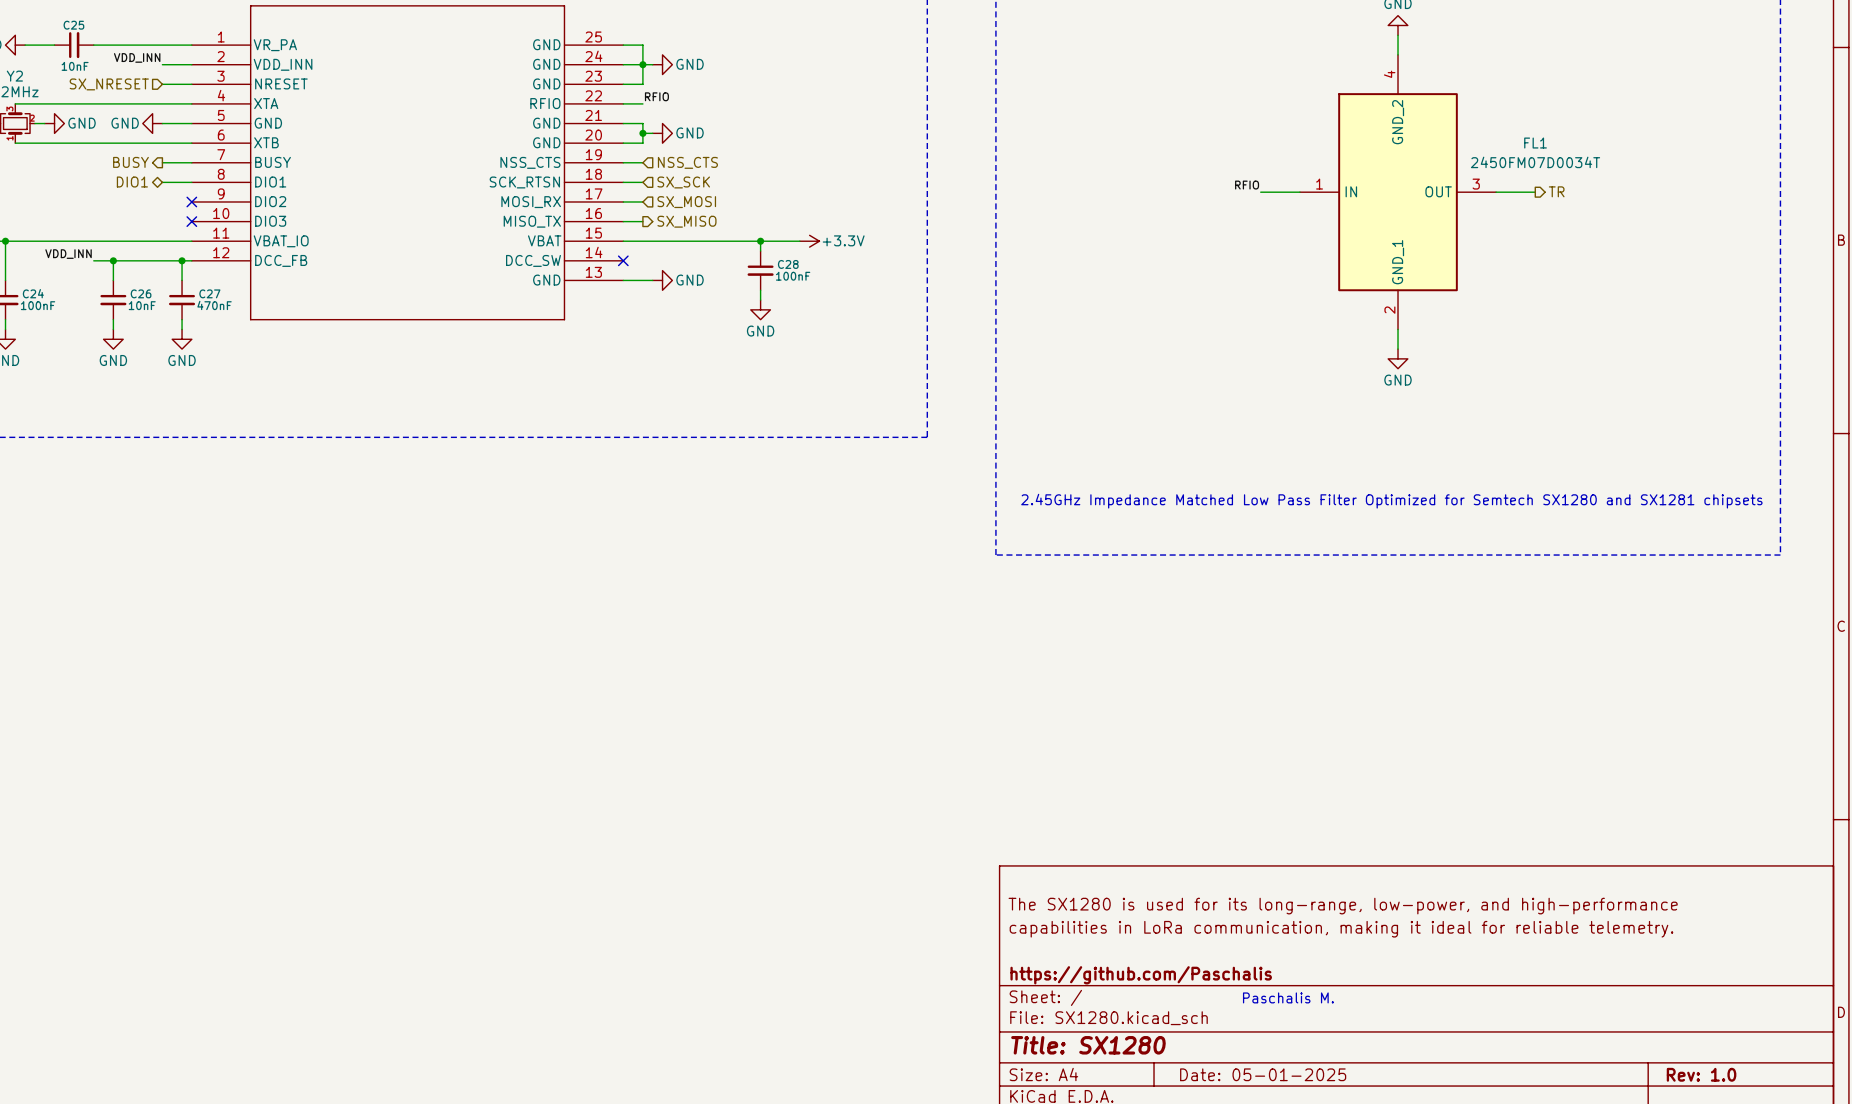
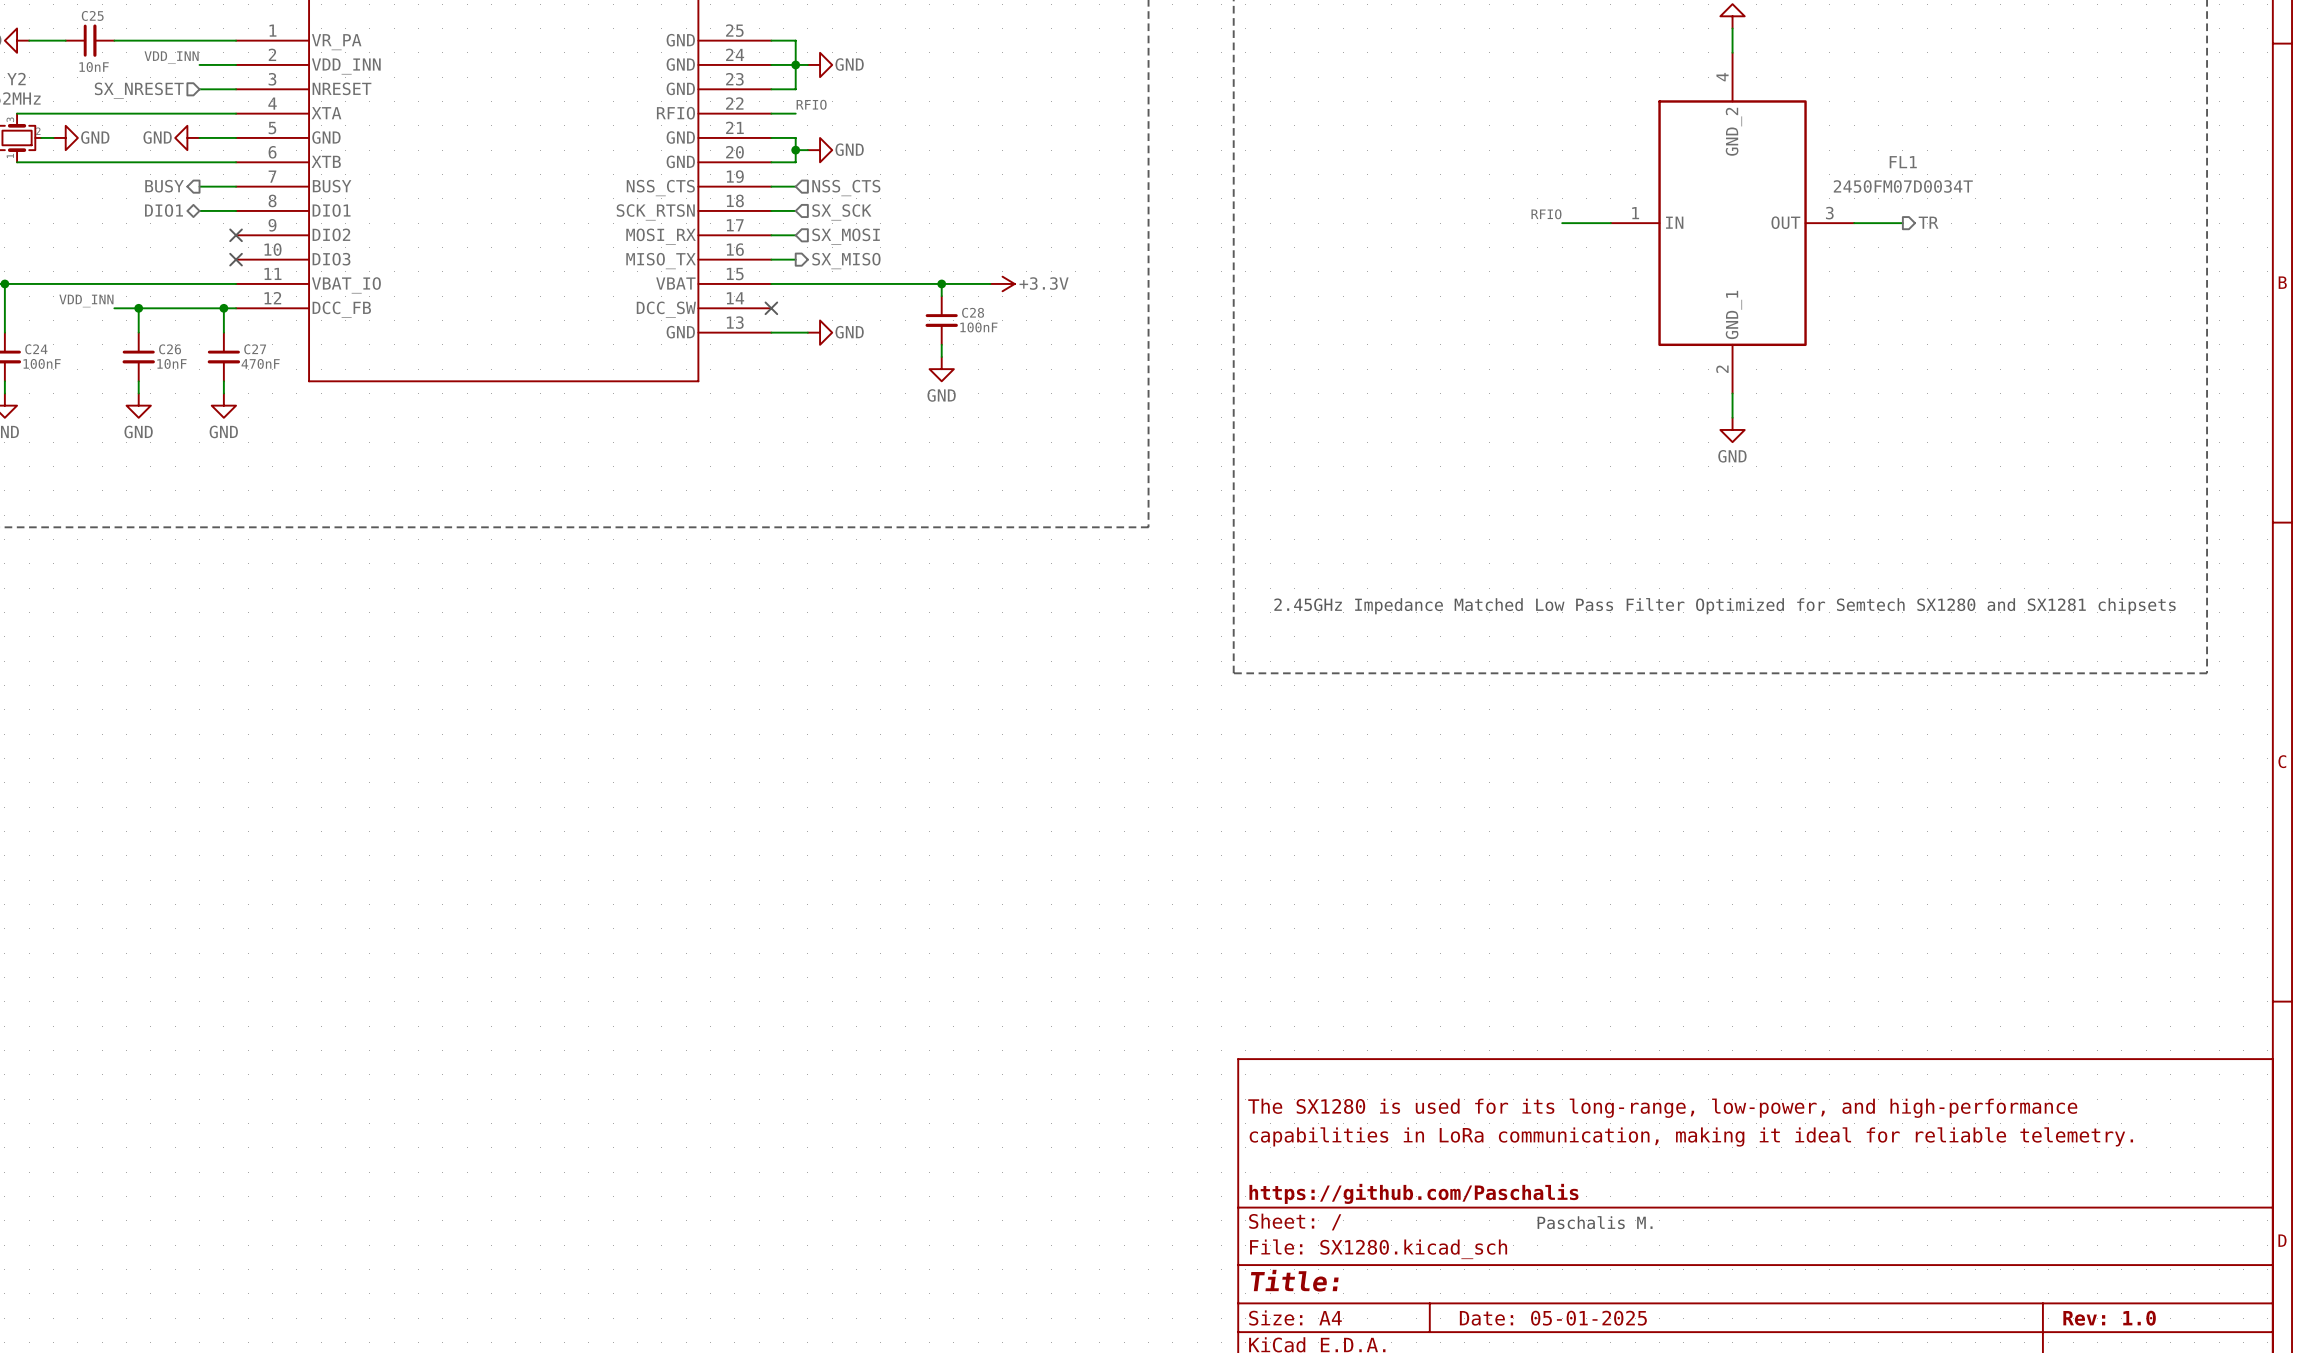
title block: Title: SX1280 (1088, 1045) -> Title: (1294, 1280)

